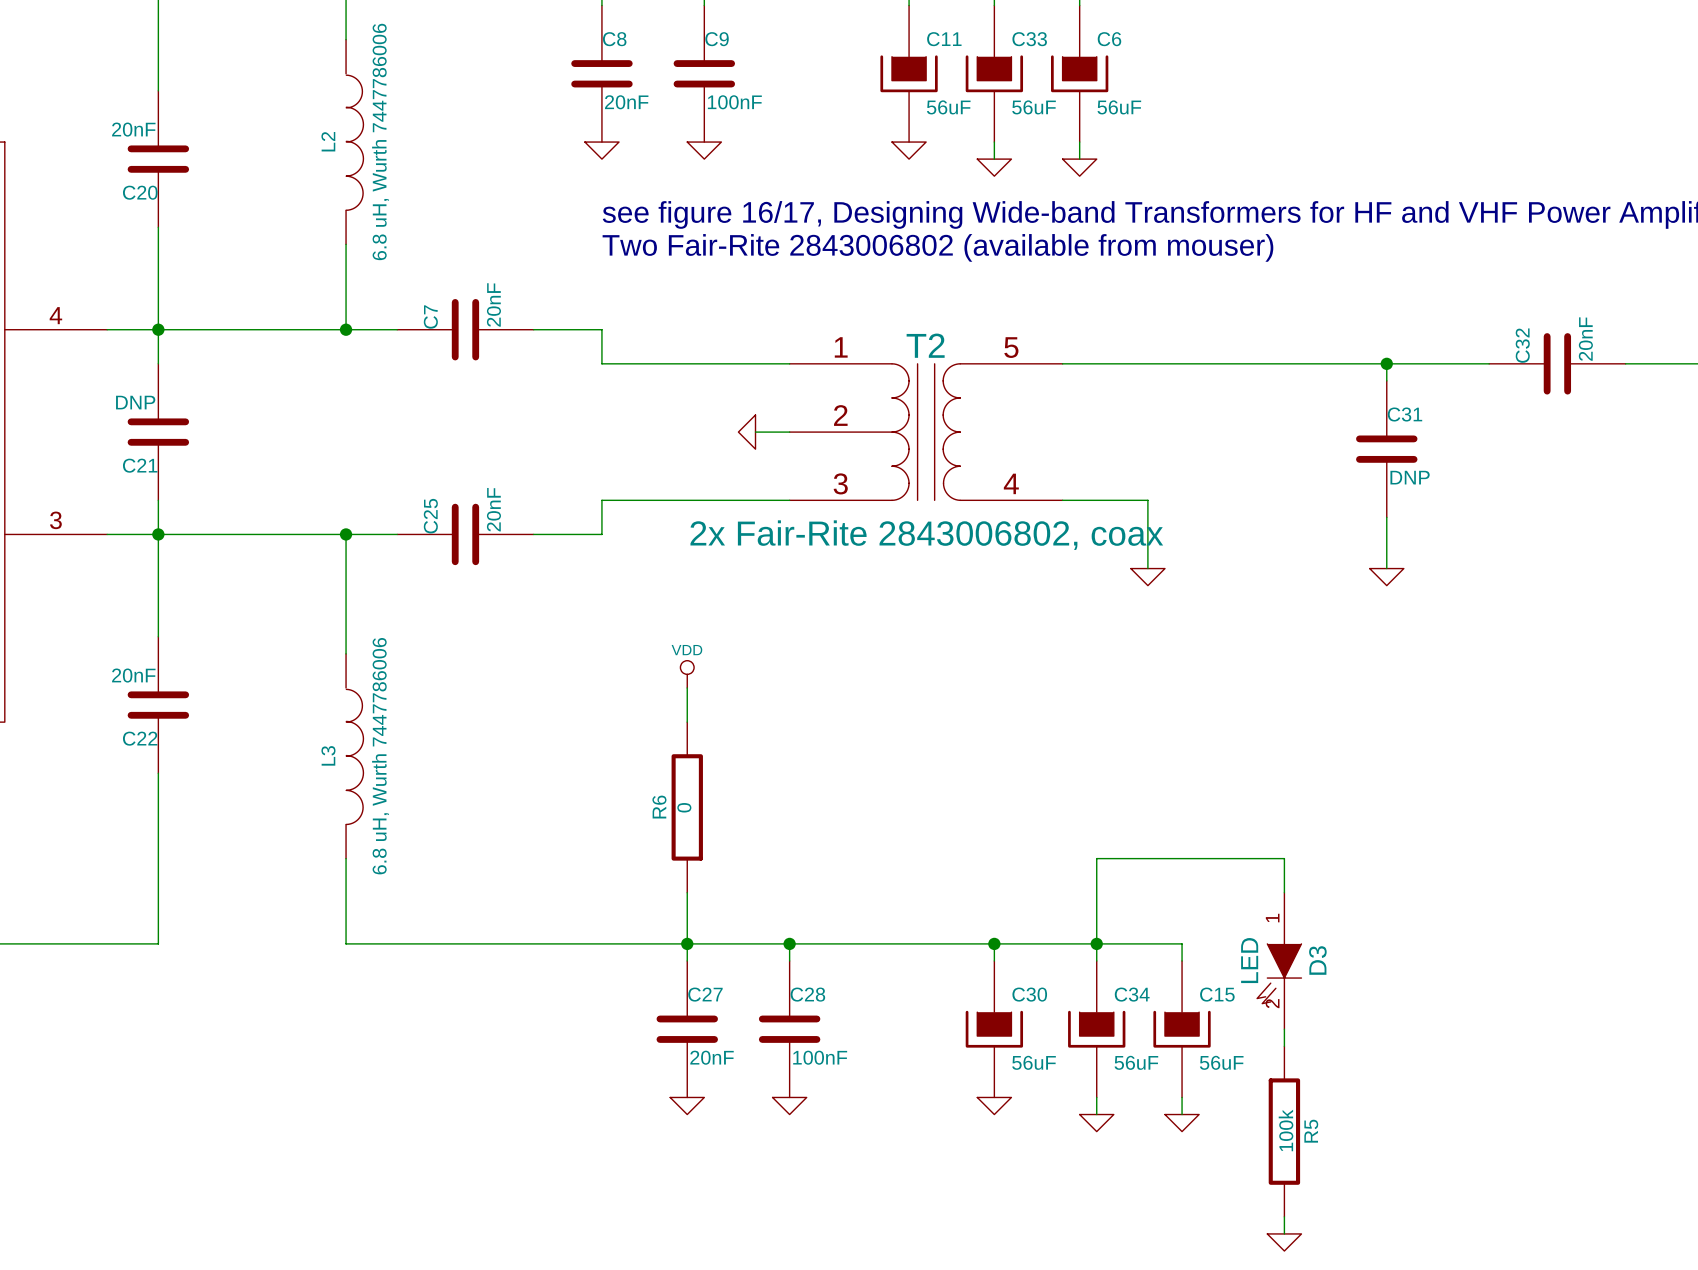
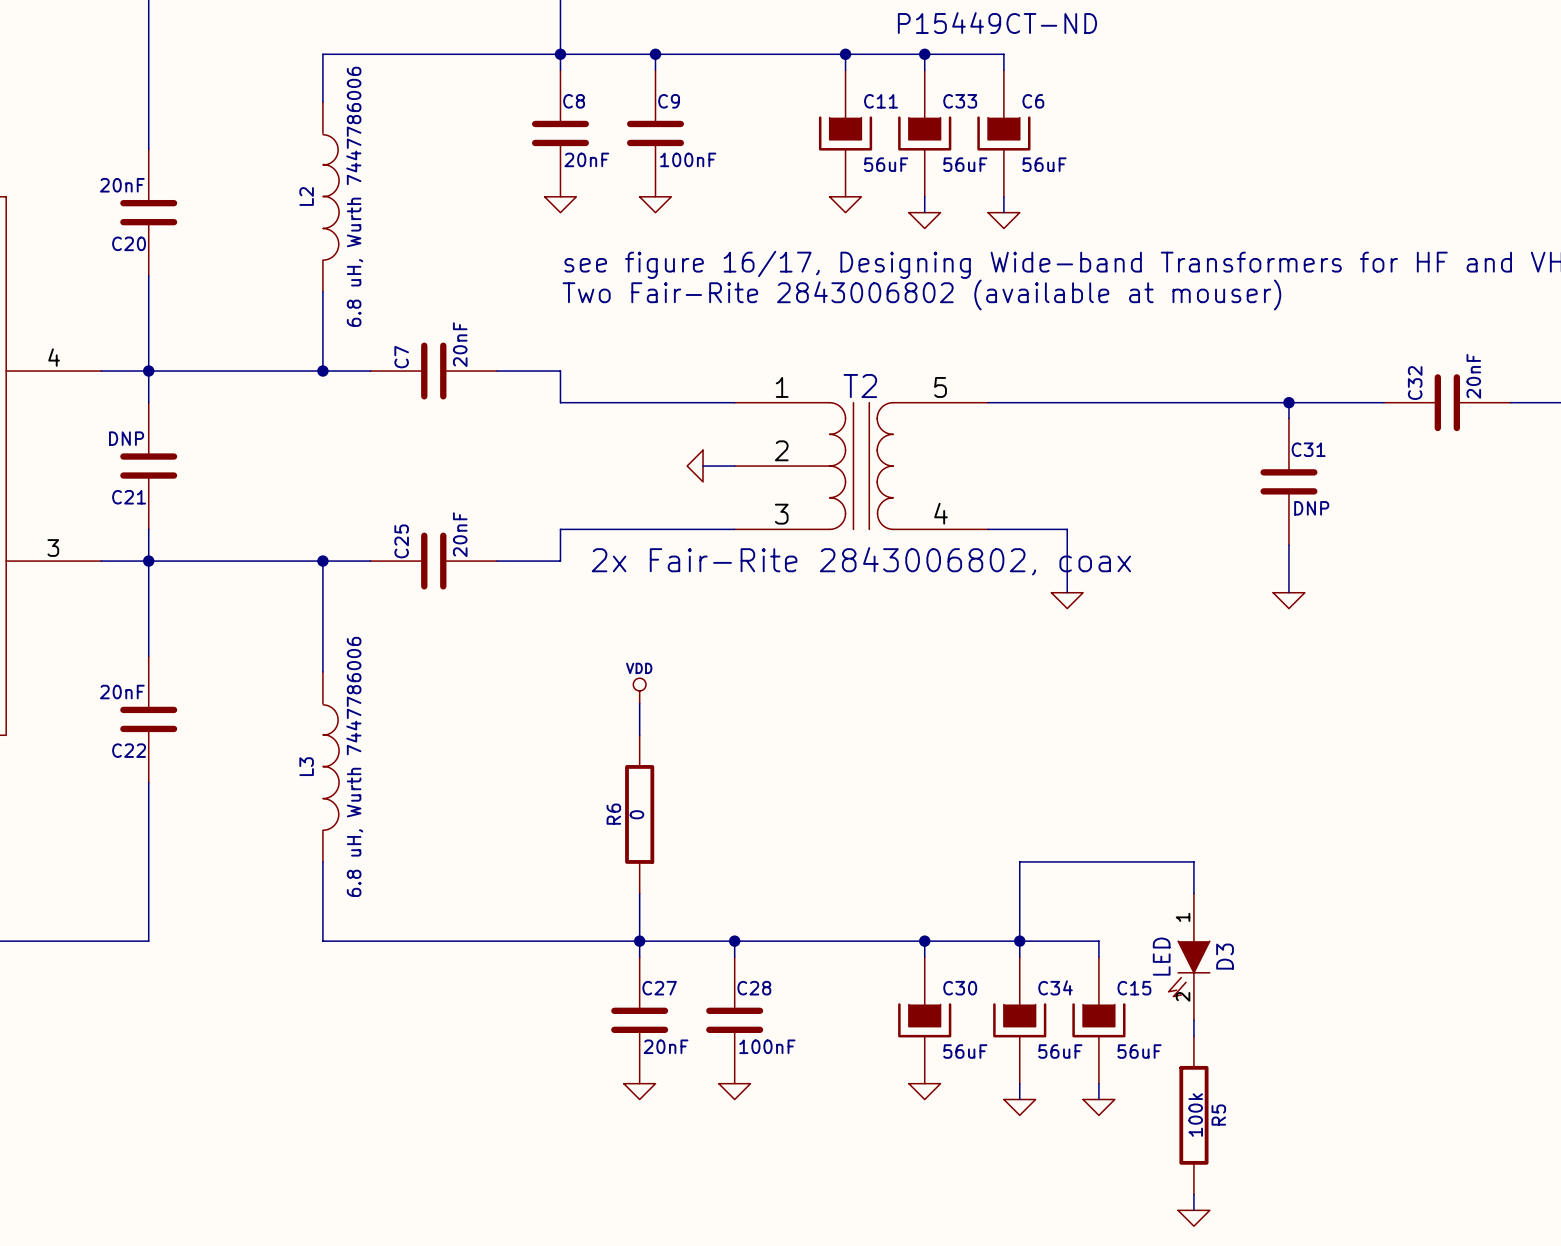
text: Two Fair-Rite 2843006802 (available from mouser) (937, 247) -> Two Fair-Rite 2843006802 (available at mouser) (921, 294)

